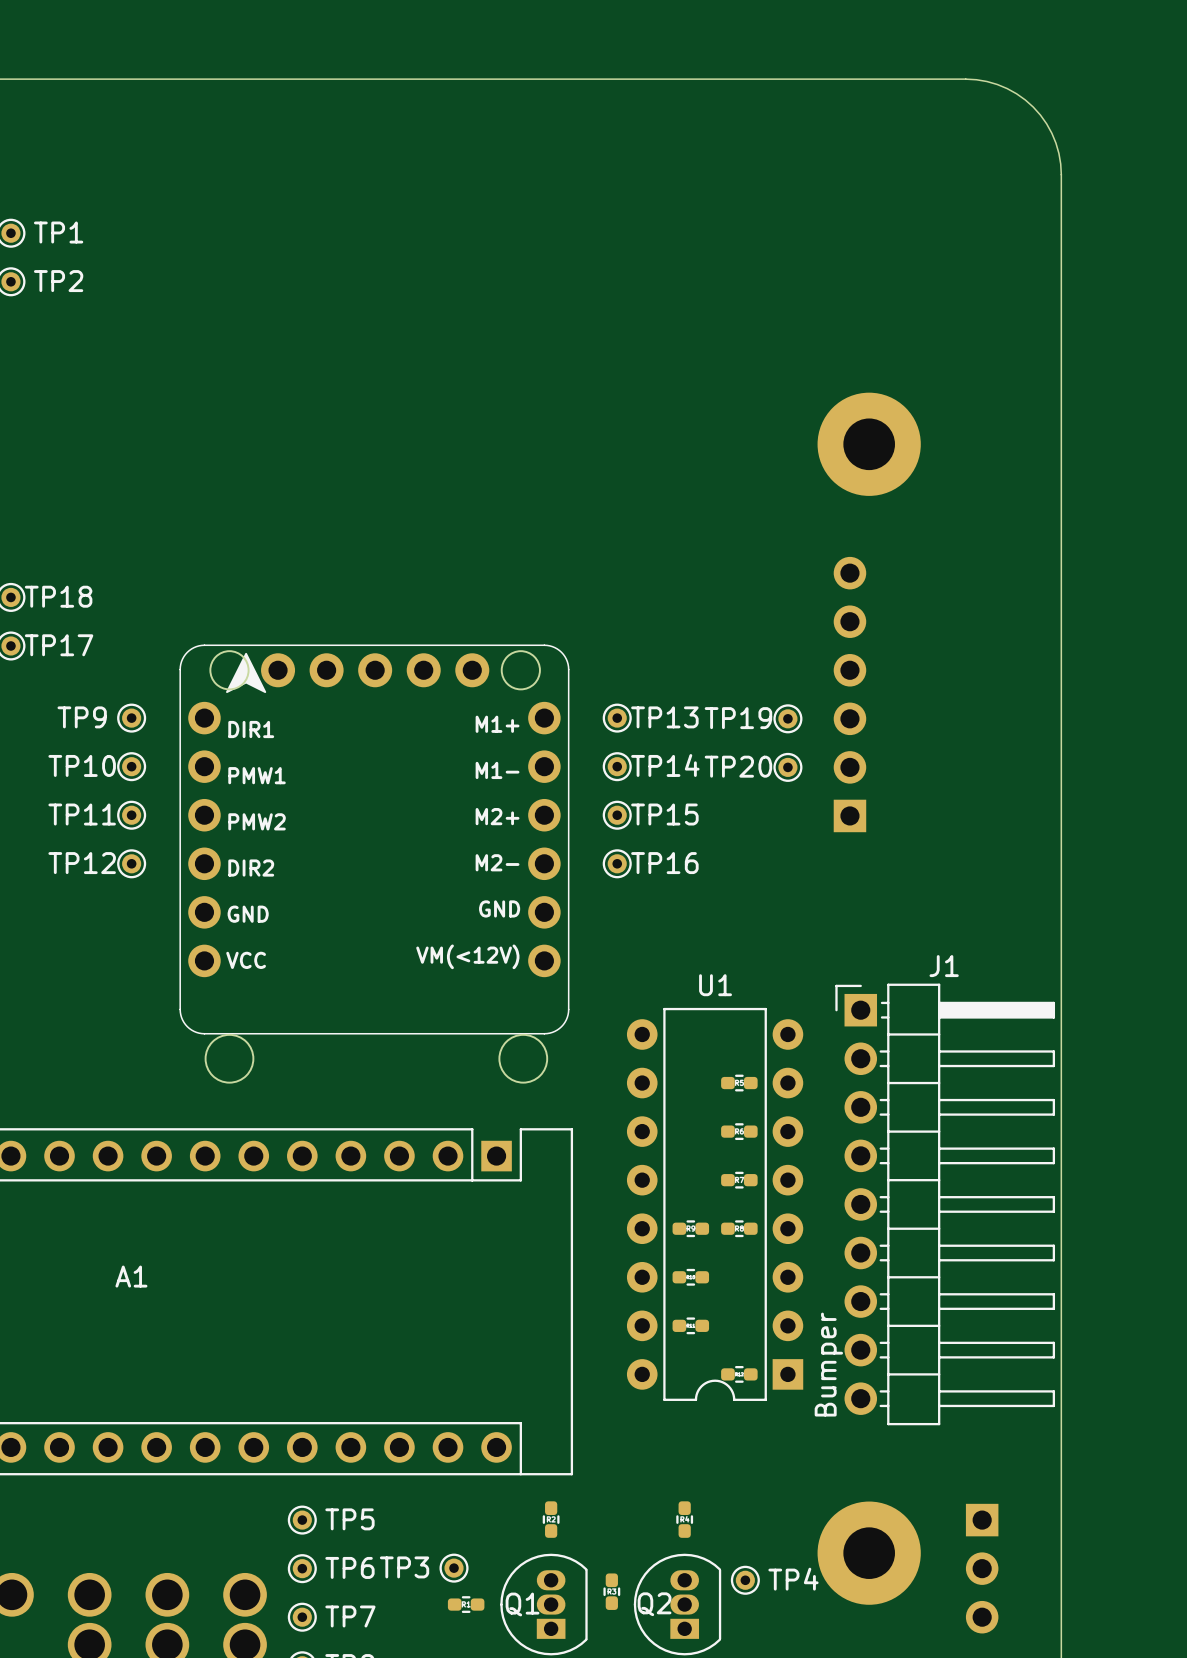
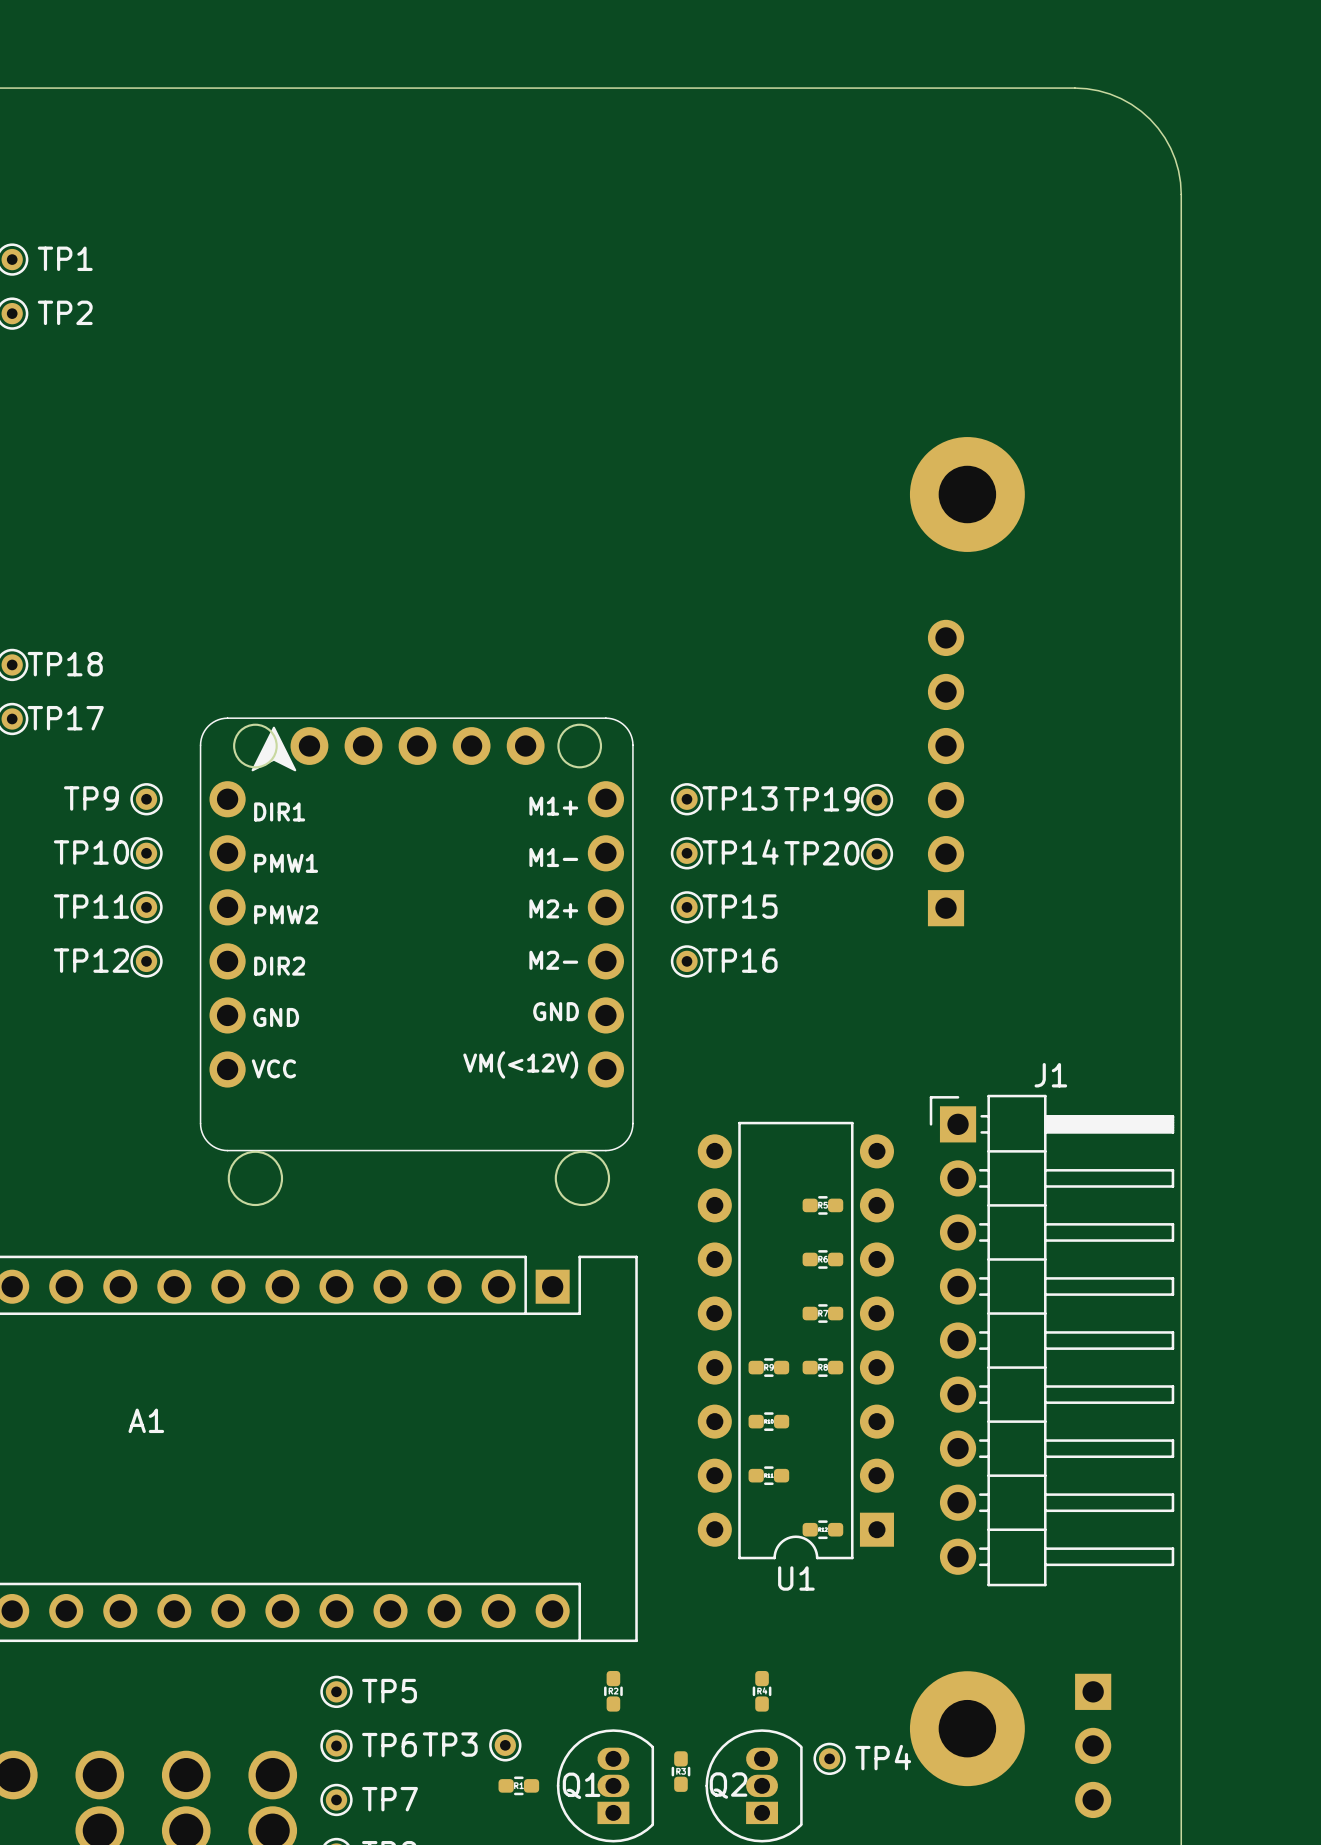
U1 name position: U1 (715, 985) -> U1 (796, 1578)
J1 value: Bumper (828, 1364) -> none

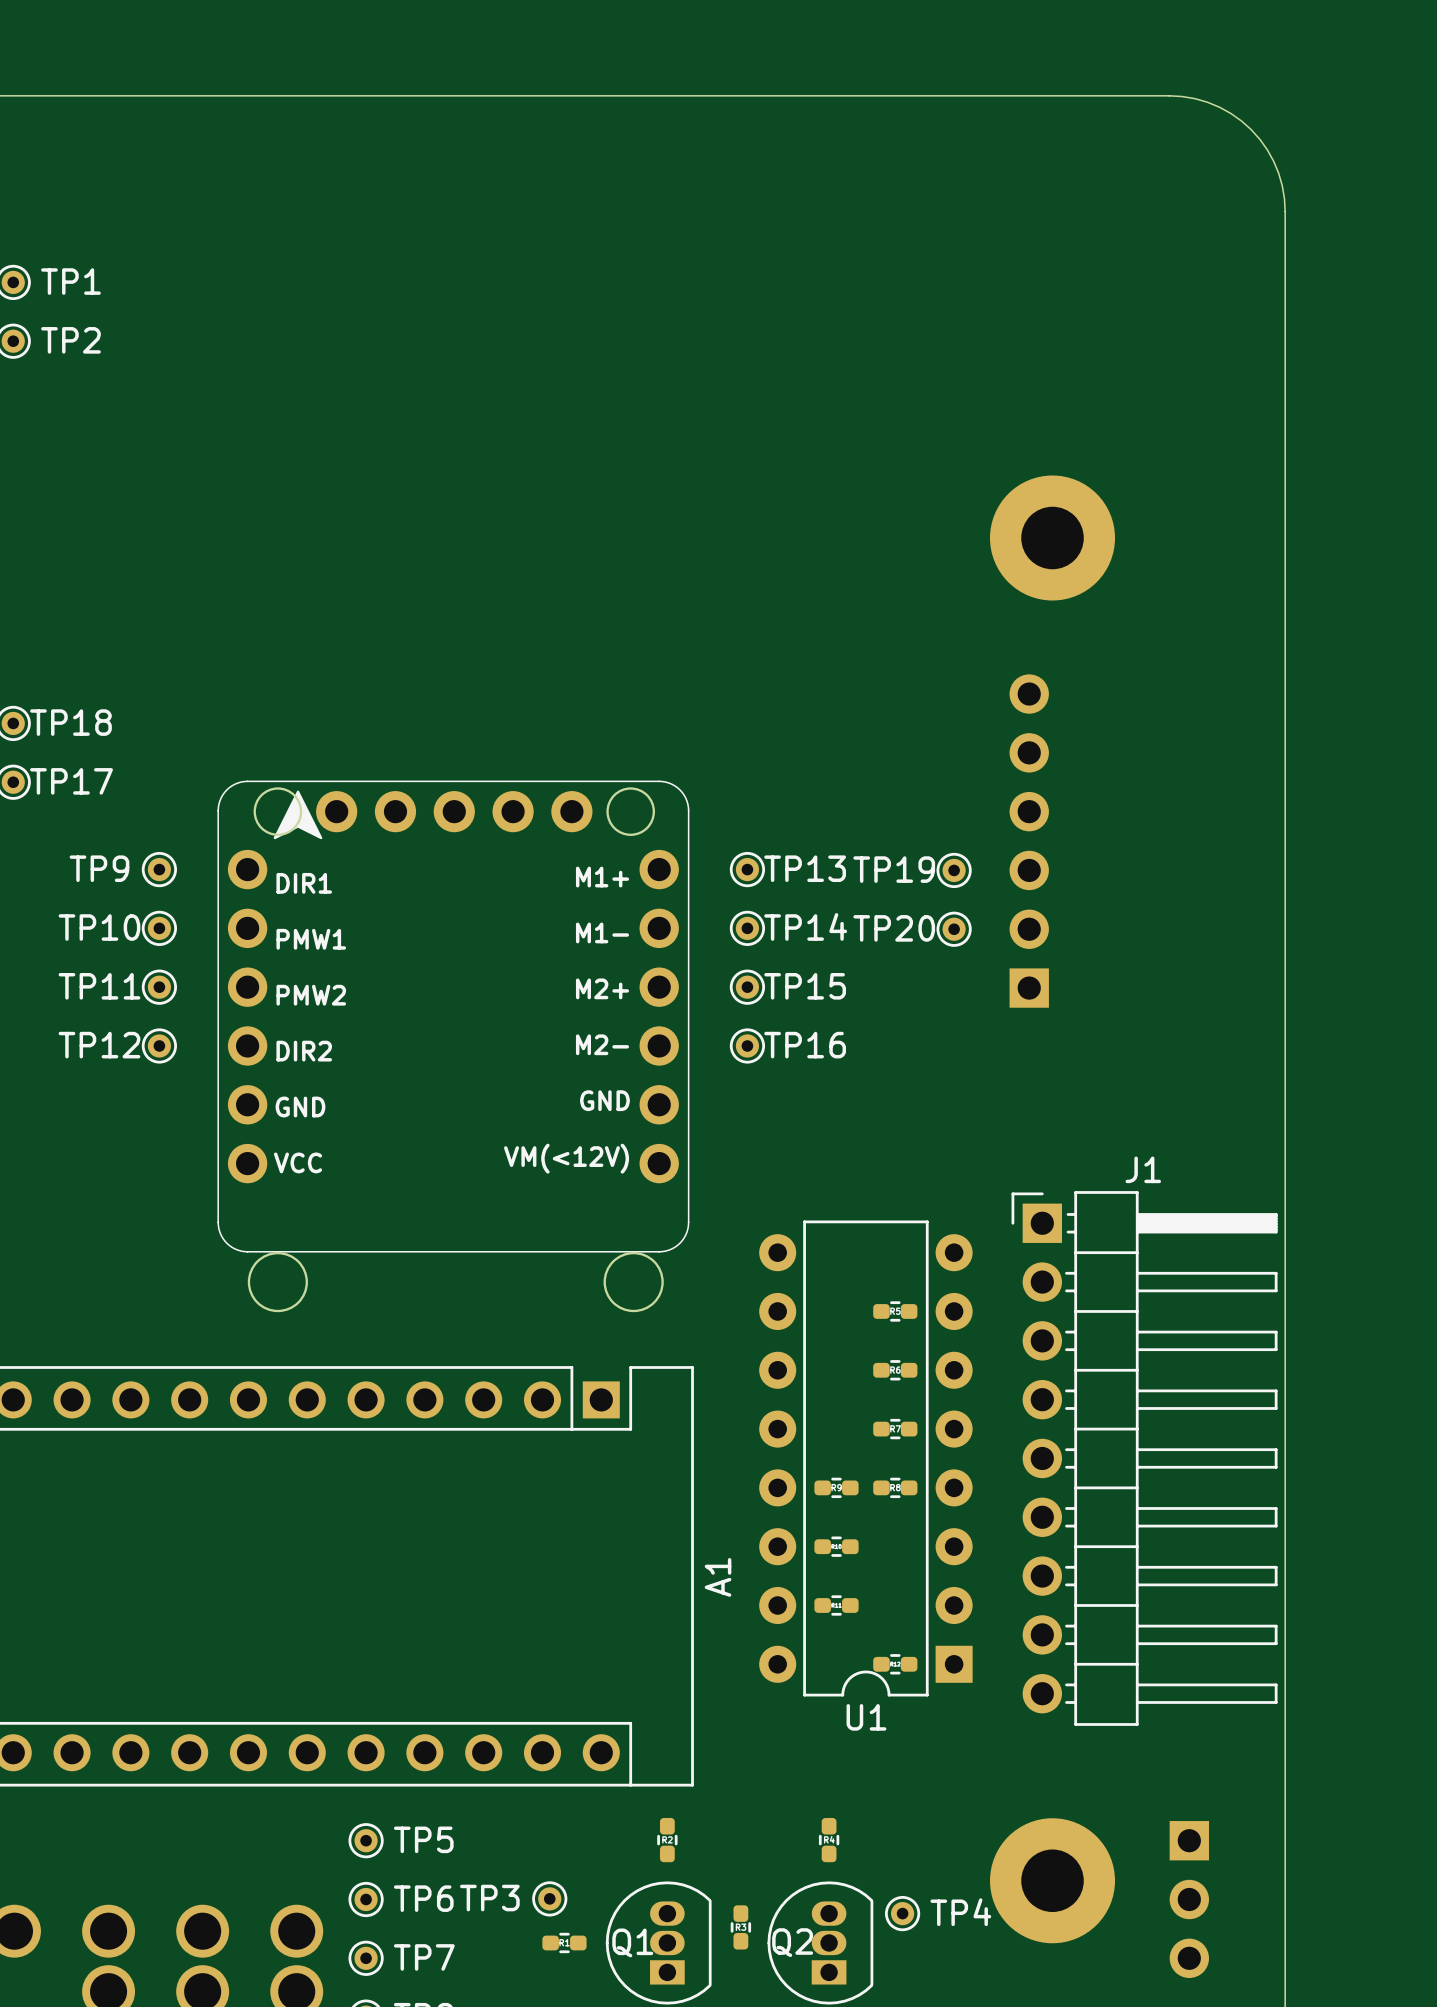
A1 name rotation: 0° (146, 1420) -> 90° counterclockwise (718, 1577)
A1 name position: A1 (146, 1420) -> A1 (718, 1577)

